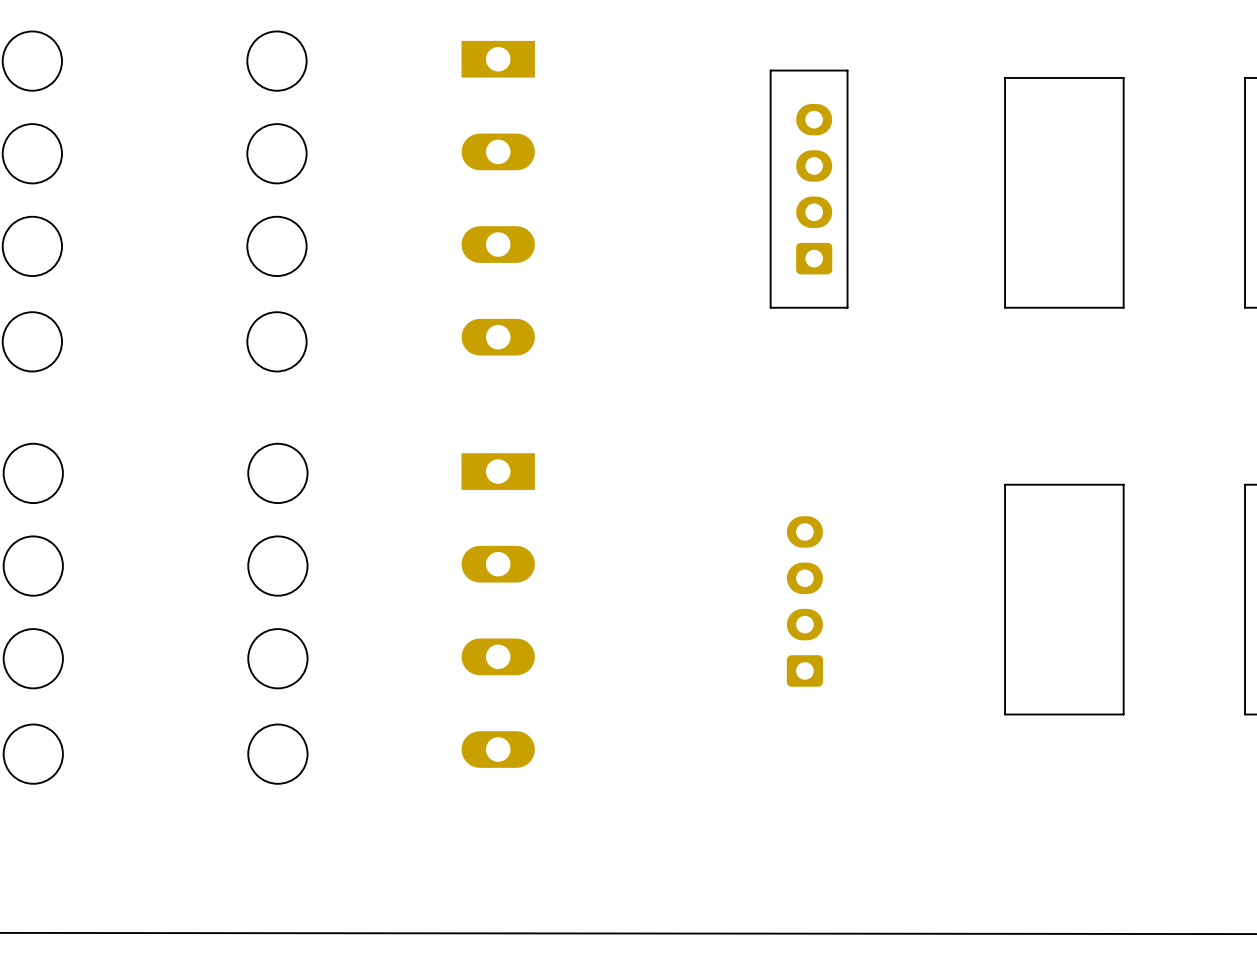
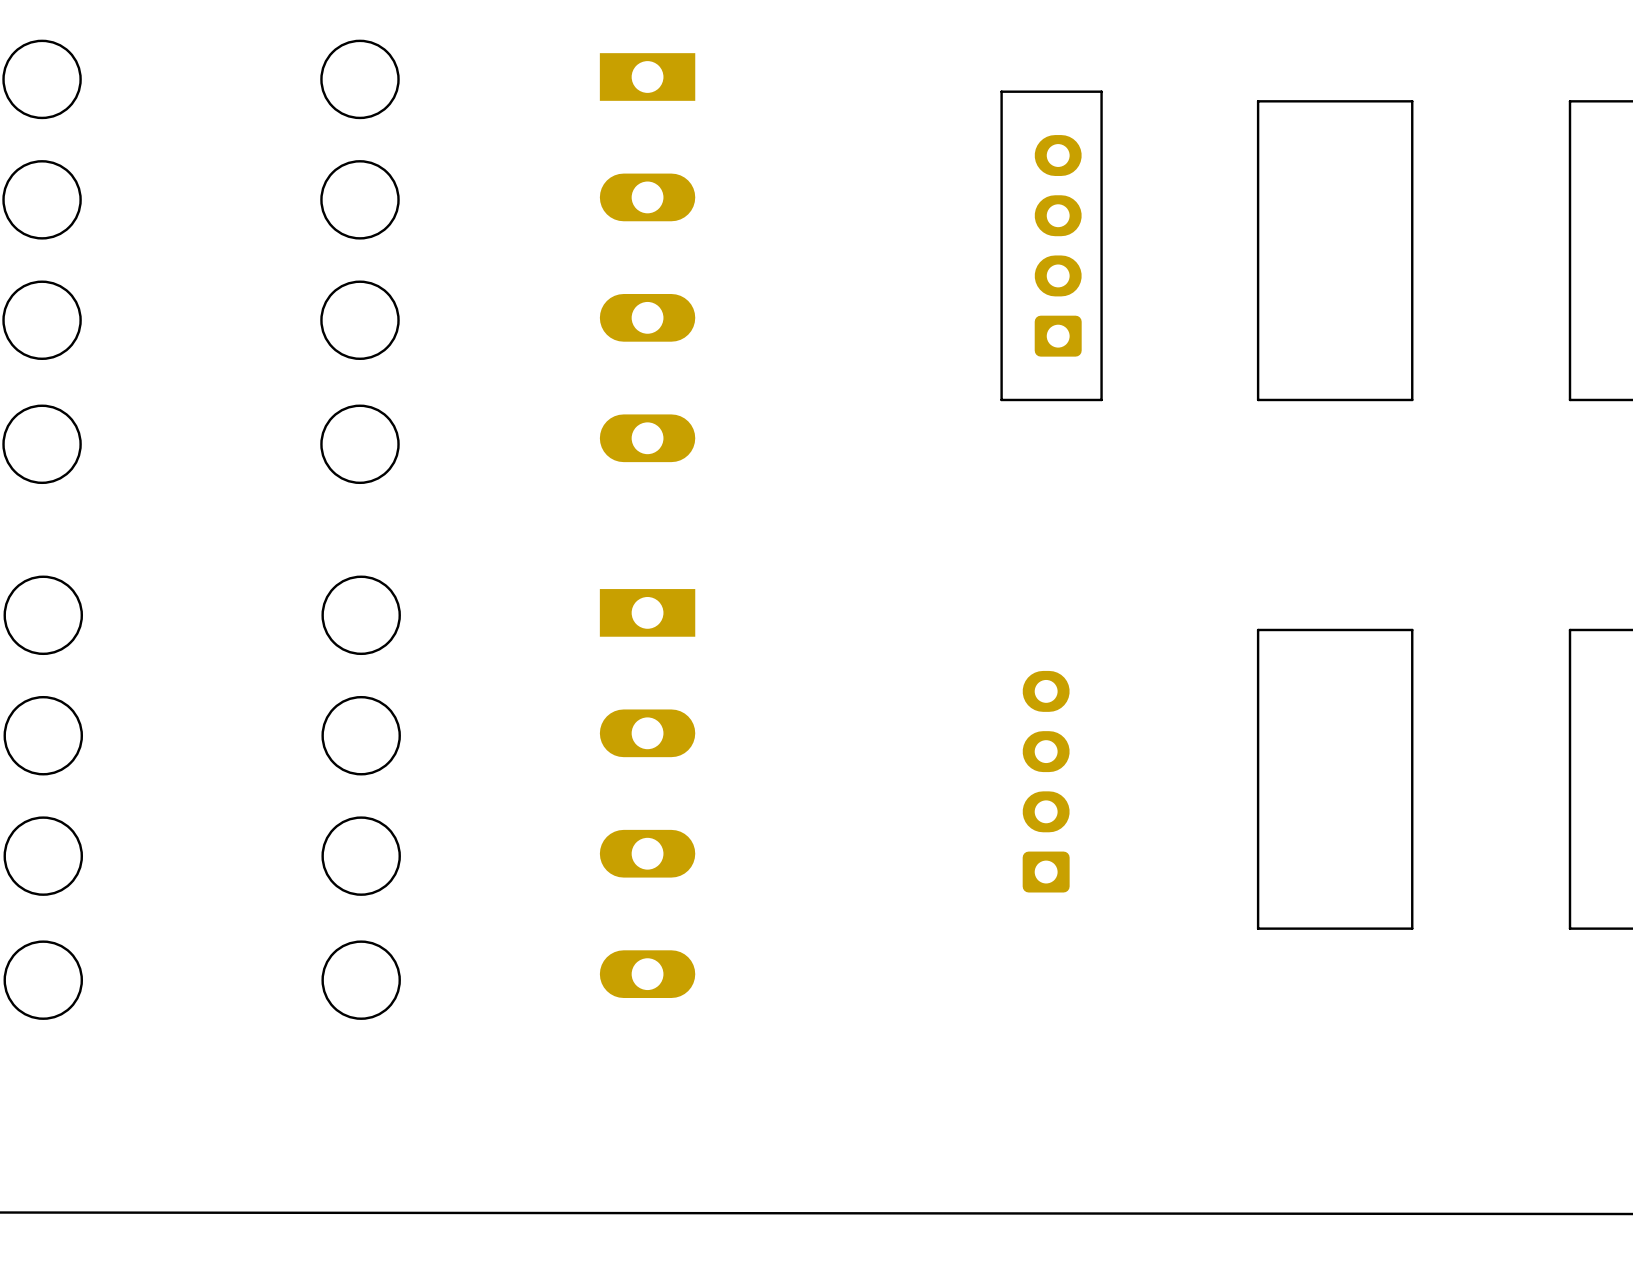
board edge: (1005, 77) (1005, 307) -> (1306, 101) (1258, 101) (1258, 399) (1306, 399)
board edge: (1086, 77) (1123, 77) (1123, 307) (1086, 307) -> (1412, 101) (1412, 399)
board edge: (1245, 77) (1245, 307) -> (1618, 101) (1570, 101) (1570, 399) (1618, 399)
board edge: (1005, 484) (1005, 714) -> (1306, 629) (1258, 629) (1258, 928) (1306, 928)
board edge: (1086, 484) (1123, 484) (1123, 714) (1086, 714) -> (1412, 629) (1412, 928)
board edge: (1245, 484) (1245, 714) -> (1618, 629) (1570, 629) (1570, 928) (1618, 928)

